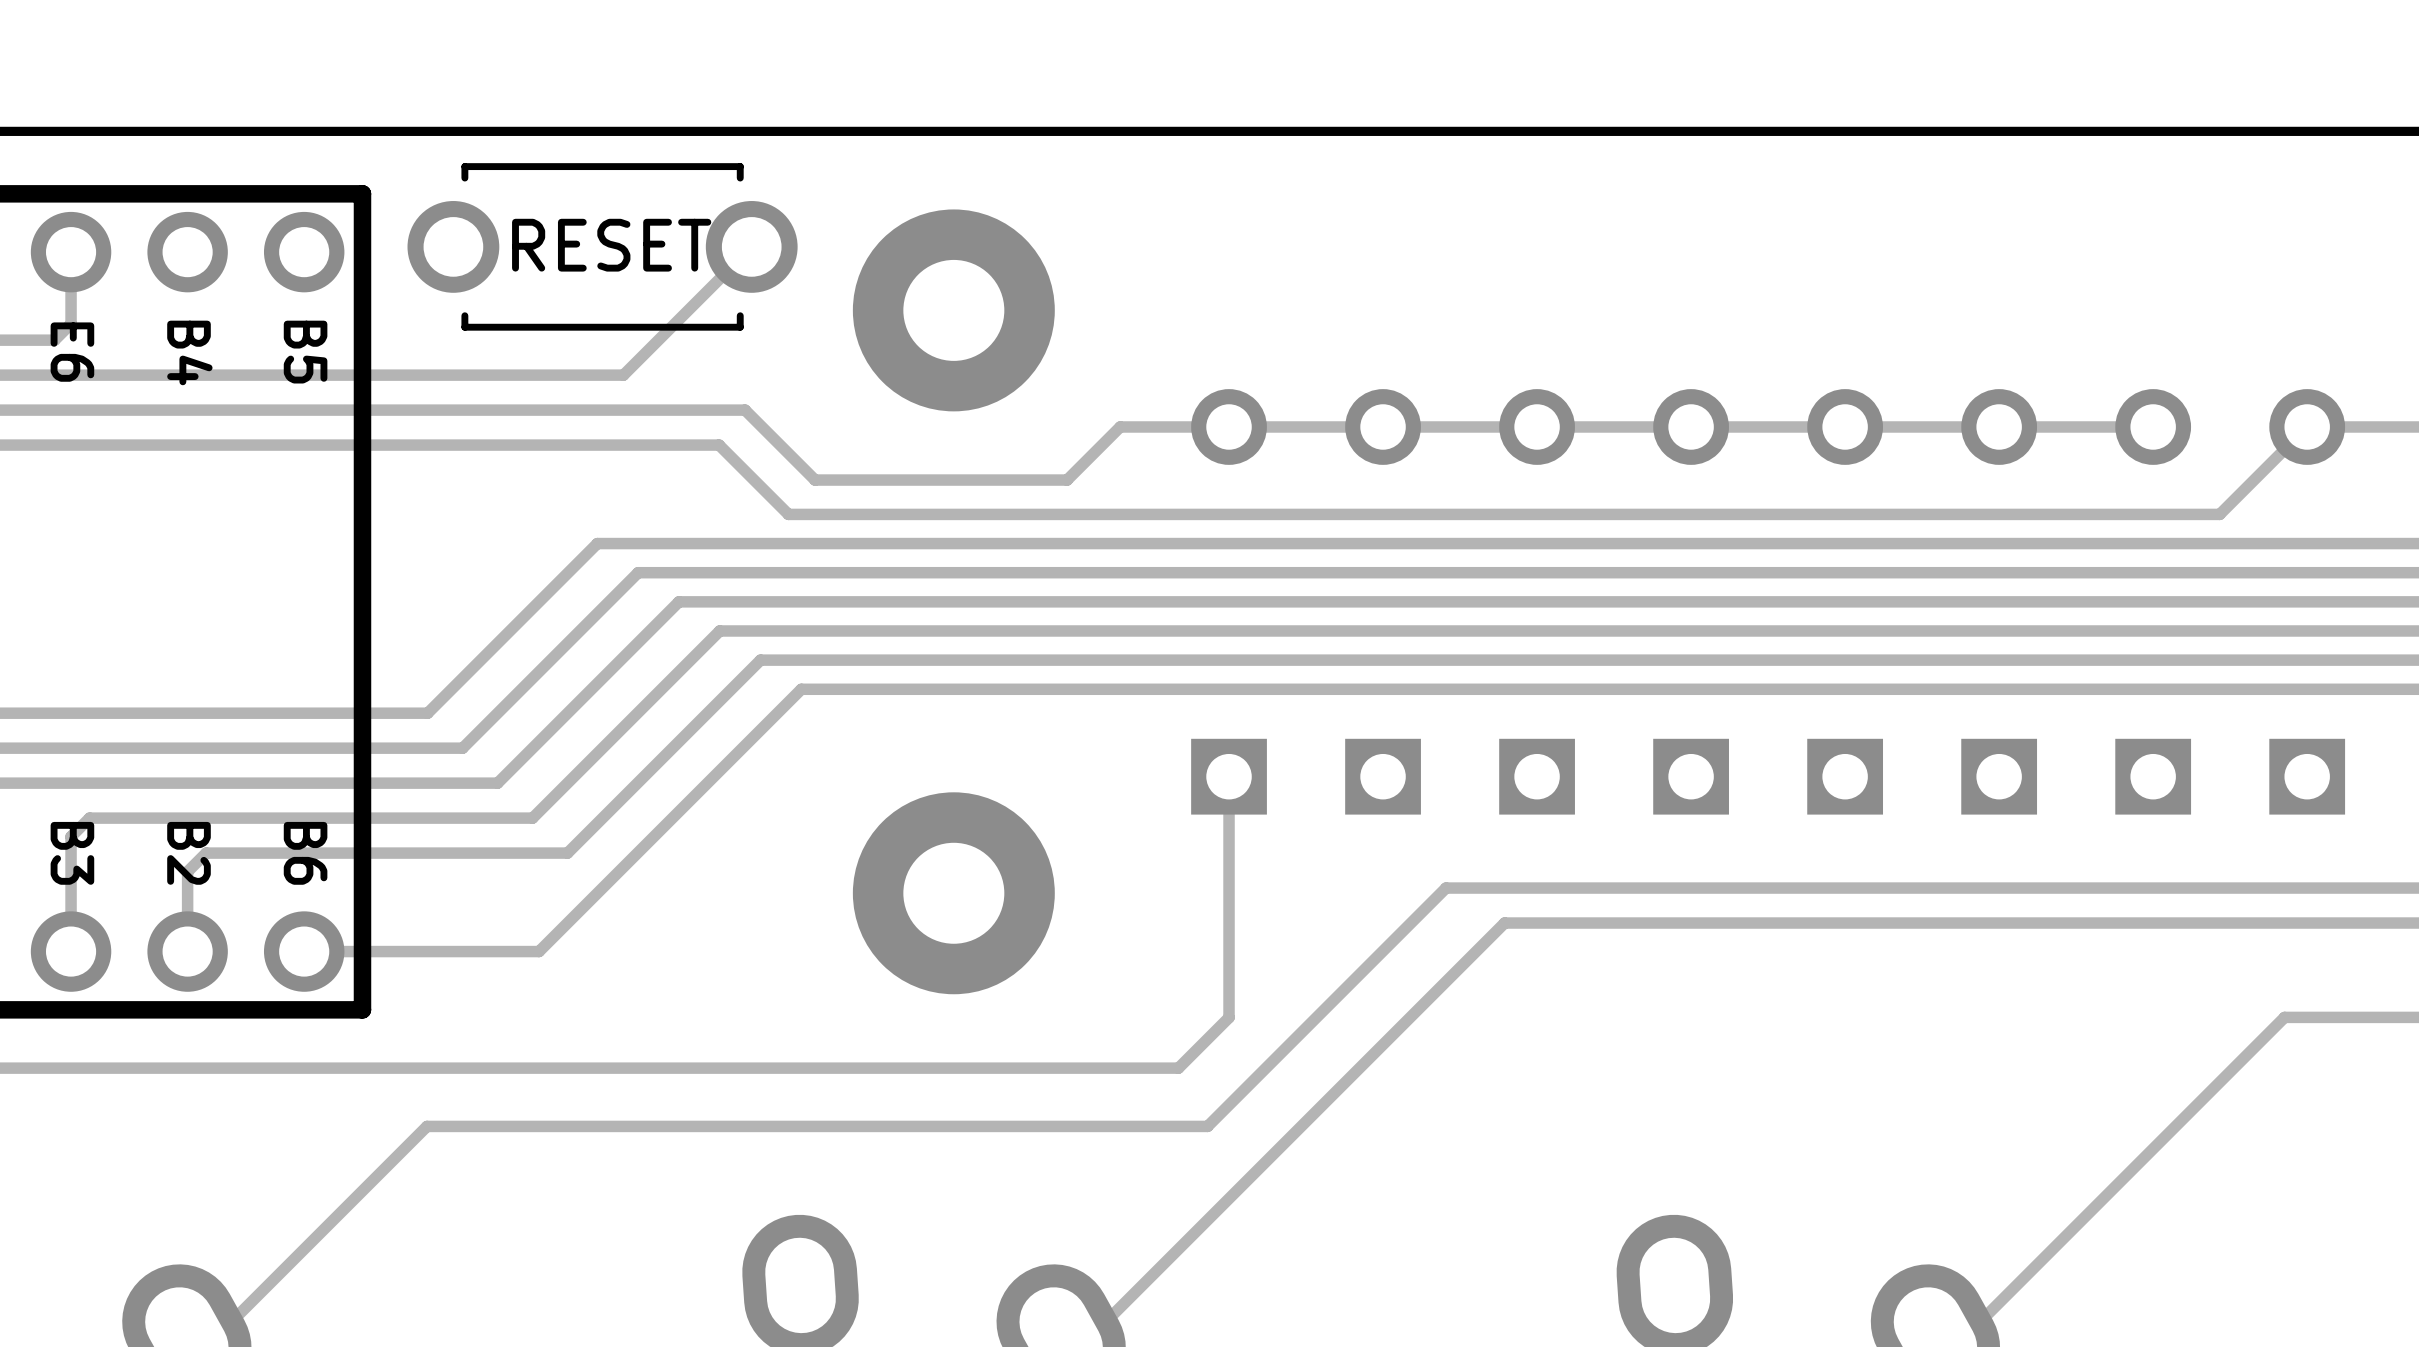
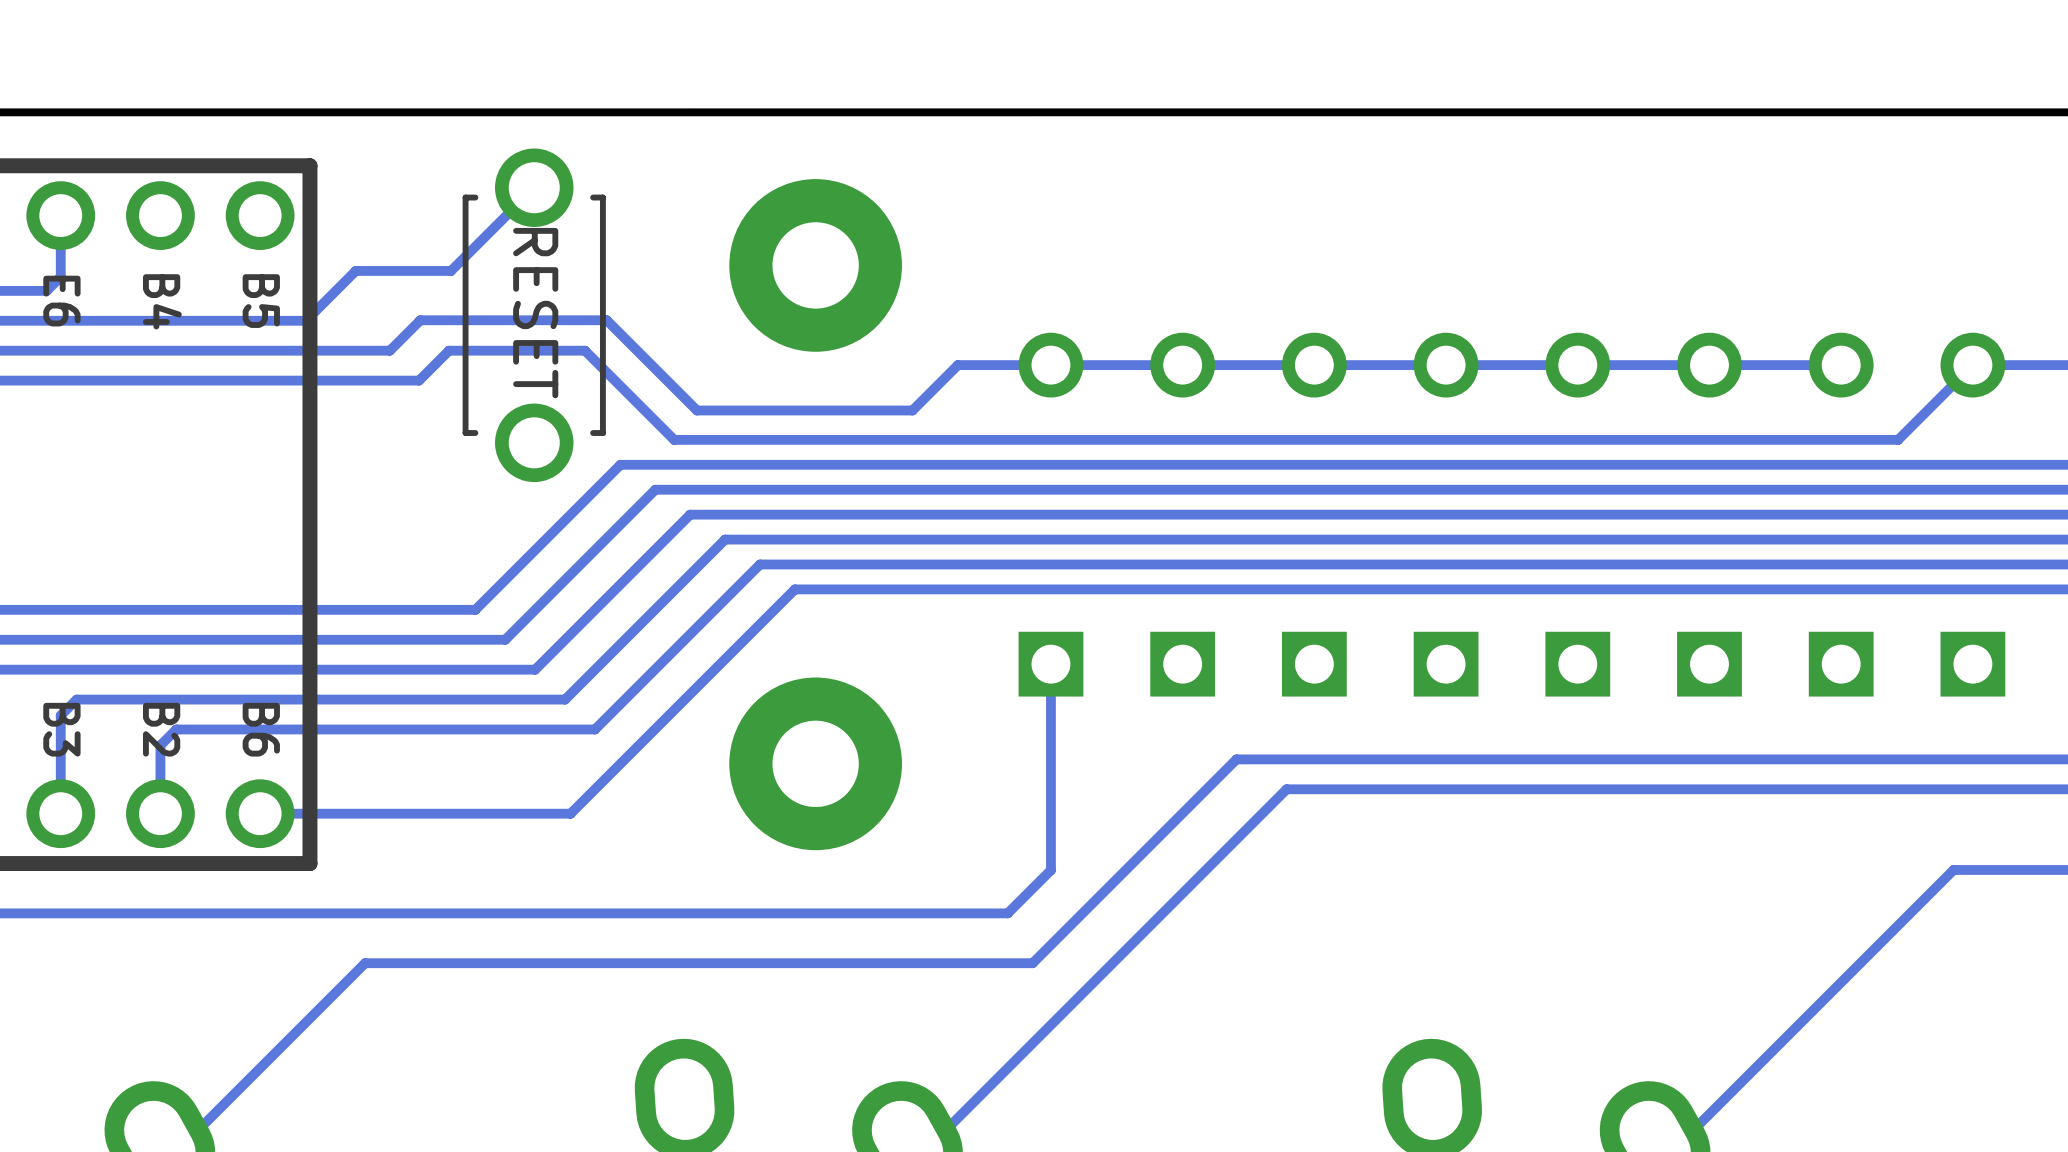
part rotation: 0° (602, 246) -> 90° counterclockwise (534, 315)
track: (751, 246) (623, 375) (357, 375) -> (534, 187) (451, 270) (355, 270) (305, 320)
track: (525, 410) (455, 410) -> (449, 350) (419, 380)
track: (745, 410) (684, 410) -> (614, 380) (585, 350)
track: none -> (637, 350) (606, 320) (420, 320) (389, 350)
track: (719, 445) (490, 445) -> none
track: (725, 543) (597, 543) (427, 713) -> (620, 464) (475, 609) (365, 609)
track: (766, 572) (638, 572) (462, 748) -> (655, 489) (505, 639) (395, 639)
track: (807, 601) (678, 601) (497, 783) -> (690, 514) (535, 669) (425, 669)
track: (847, 630) (719, 630) (532, 818) -> (725, 539) (565, 699) (455, 699)
track: (888, 660) (760, 660) (567, 853) -> (760, 564) (595, 729) (485, 729)
track: (929, 689) (801, 689) (539, 951) -> (794, 589) (570, 813) (460, 813)

